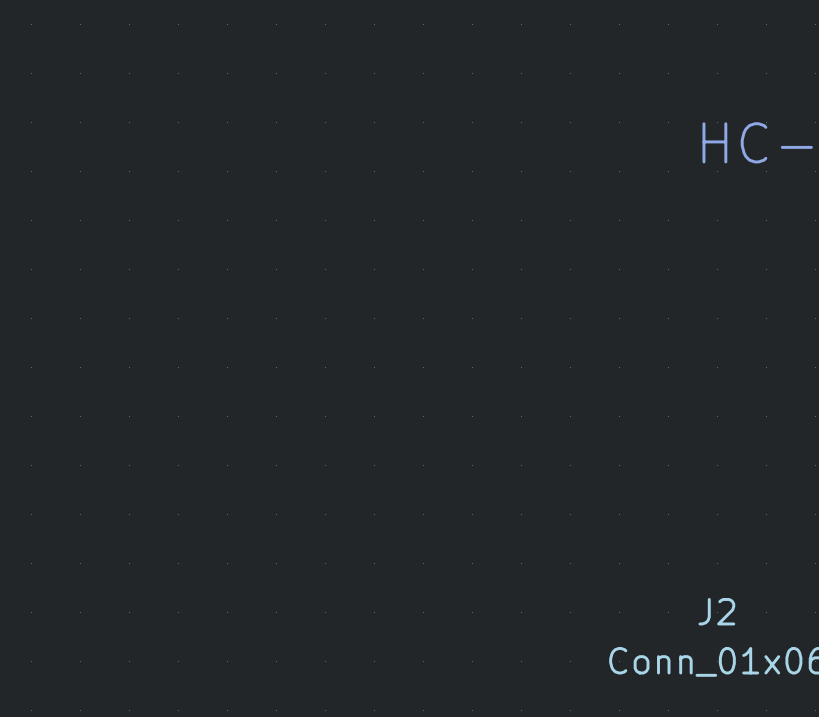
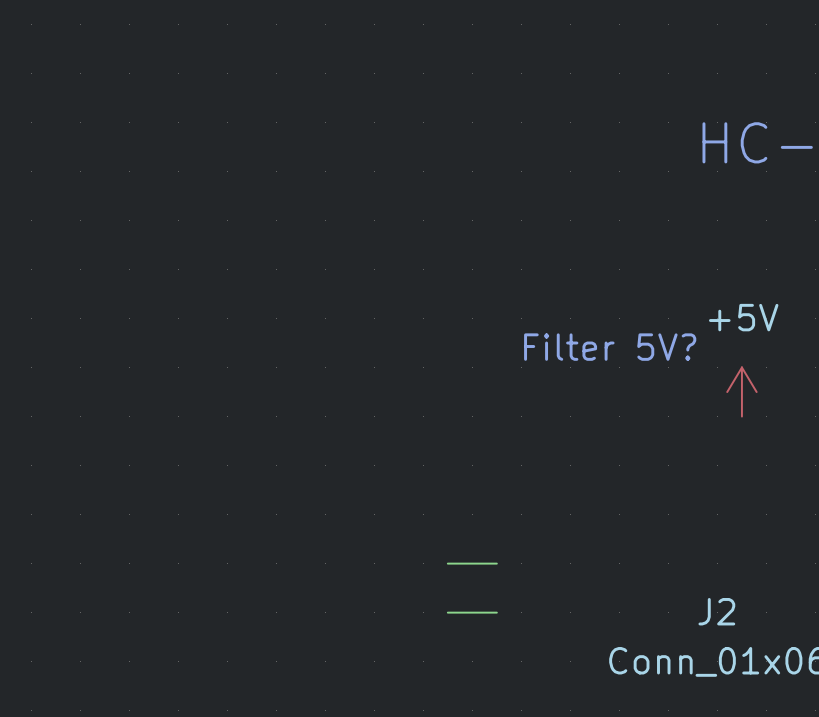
text: none -> Filter 5V? (610, 347)
power symbol: none -> +5V (741, 392)
wire: none -> (447, 563) (496, 563)
wire: none -> (447, 612) (496, 612)

